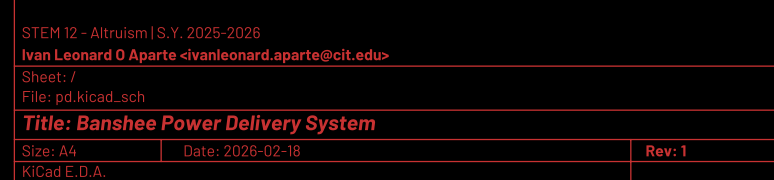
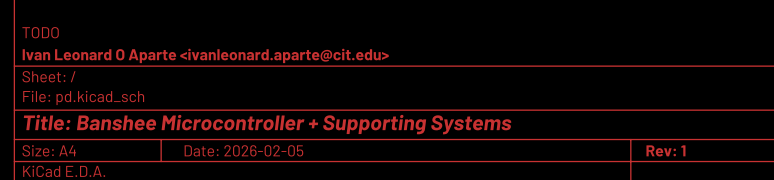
title block: STEM 12 - Altruism | S.Y. 2025-2026 (141, 32) -> TODO (40, 32)
title block: Title: Banshee Power Delivery System (199, 124) -> Title: Banshee Microcontroller + Supporting Systems (267, 124)
title block: Date: 2026-02-18 (242, 150) -> Date: 2026-02-05 (243, 150)

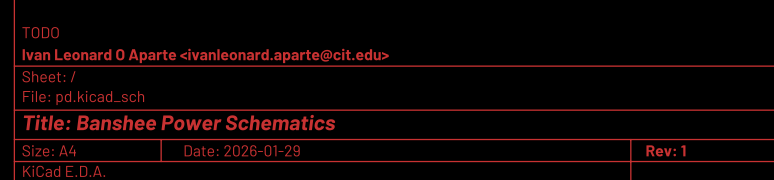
title block: Title: Banshee Microcontroller + Supporting Systems (267, 124) -> Title: Banshee Power Schematics (179, 122)
title block: Date: 2026-02-05 (243, 150) -> Date: 2026-01-29 (242, 150)

